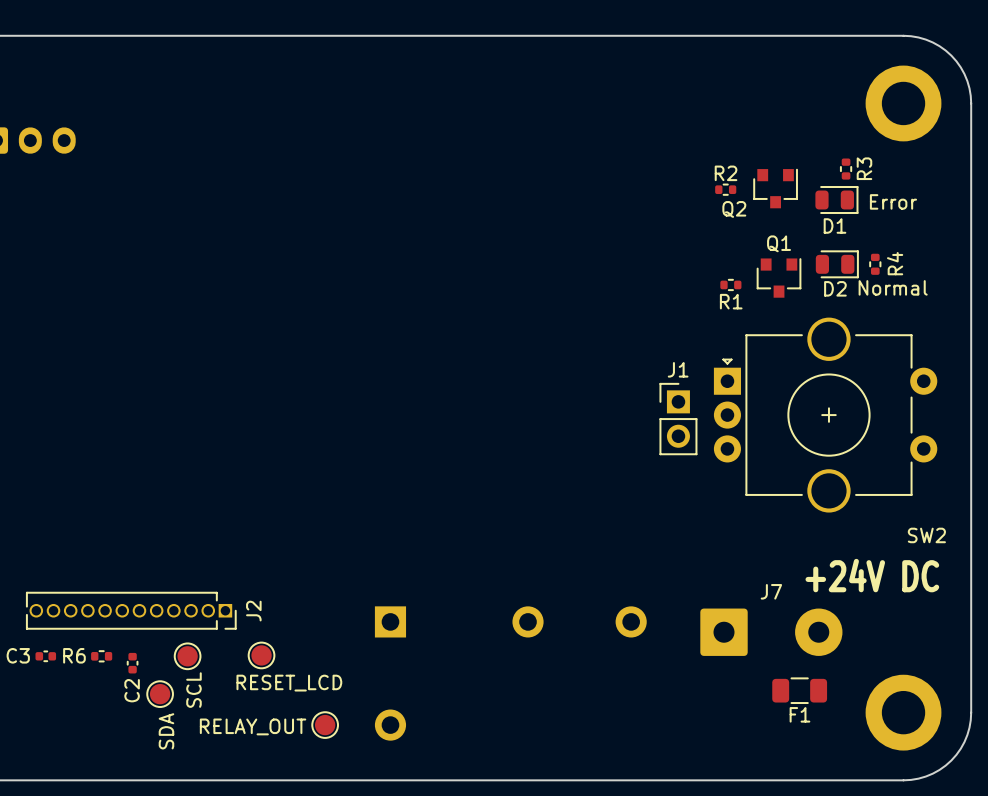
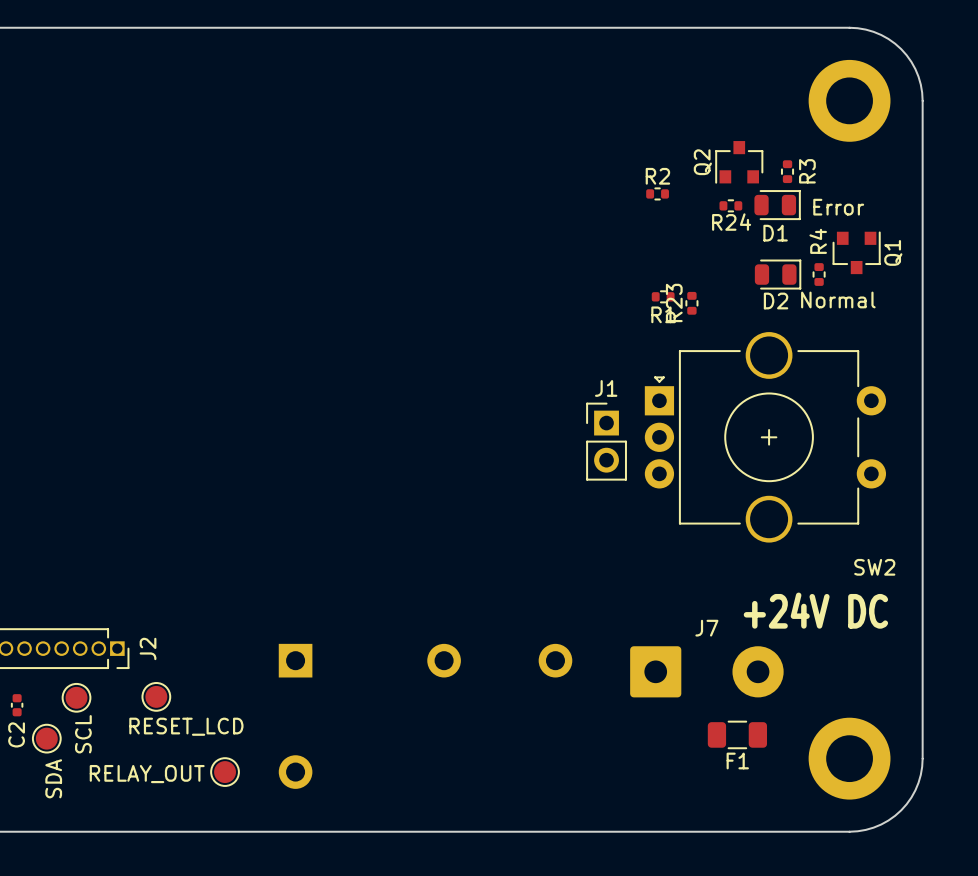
Q2 rotation: 0° (775, 188) -> 180° (739, 162)
Q2 position: (775, 188) -> (739, 162)
R24: none -> (730, 205)
Q1 name rotation: 0° (779, 243) -> 90° counterclockwise (893, 252)
Q1 name position: Q1 (779, 243) -> Q1 (893, 252)
R4 name position: R4 (895, 263) -> R4 (818, 241)
Q1 position: (779, 278) -> (856, 252)
R23: none -> (691, 303)

